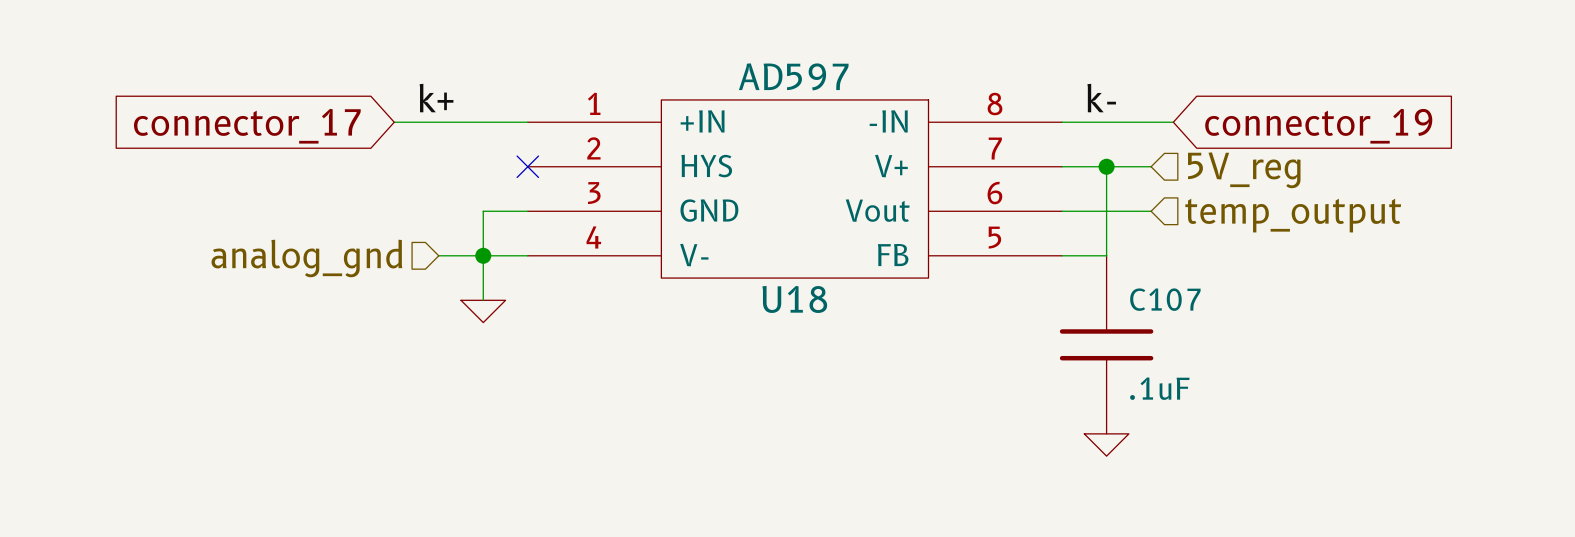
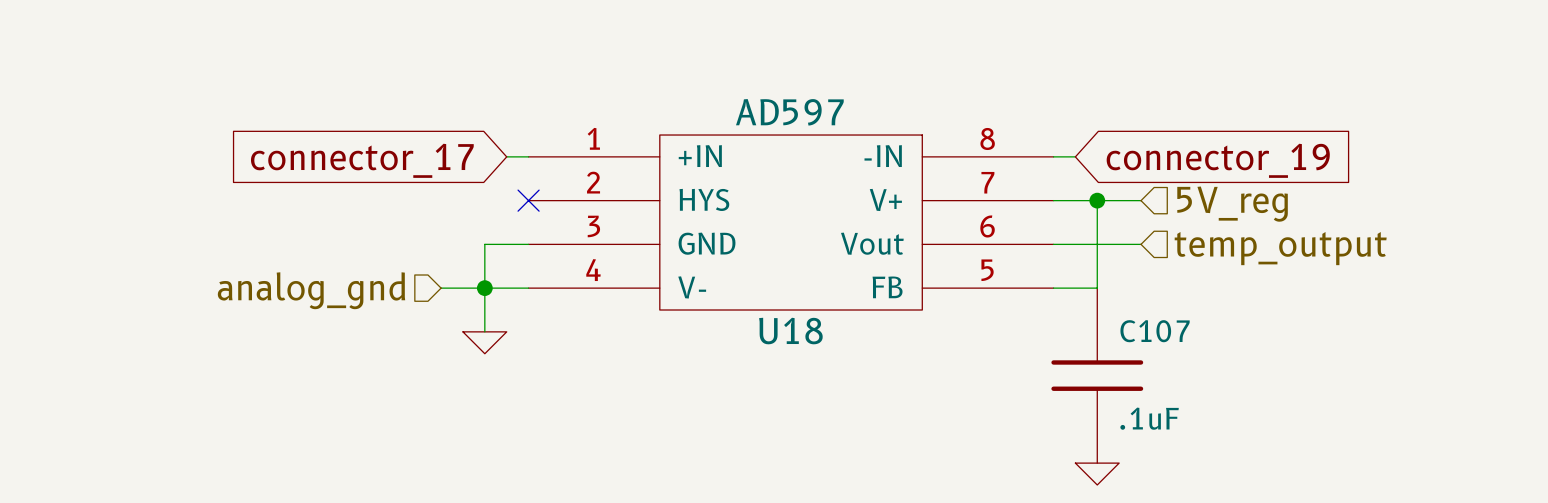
label: k+ (436, 98) -> none
label: k- (1101, 98) -> none
wire: (394, 122) (505, 122) -> none
wire: (1084, 122) (1173, 122) -> none
global label position: connector_17 (247, 126) -> connector_17 (362, 160)
global label position: connector_19 (1318, 126) -> connector_19 (1218, 160)

